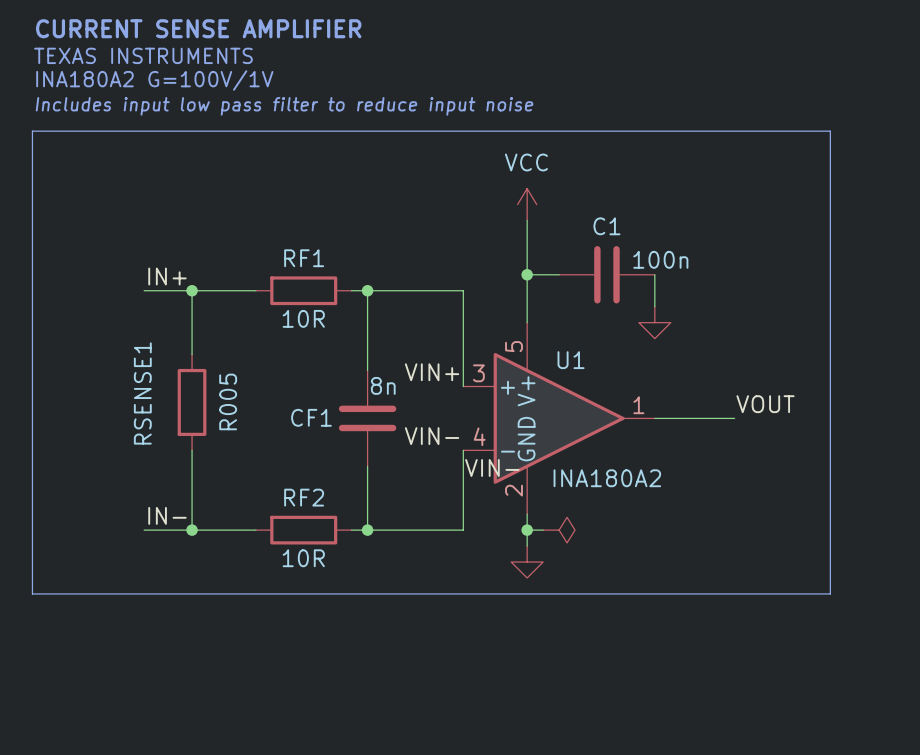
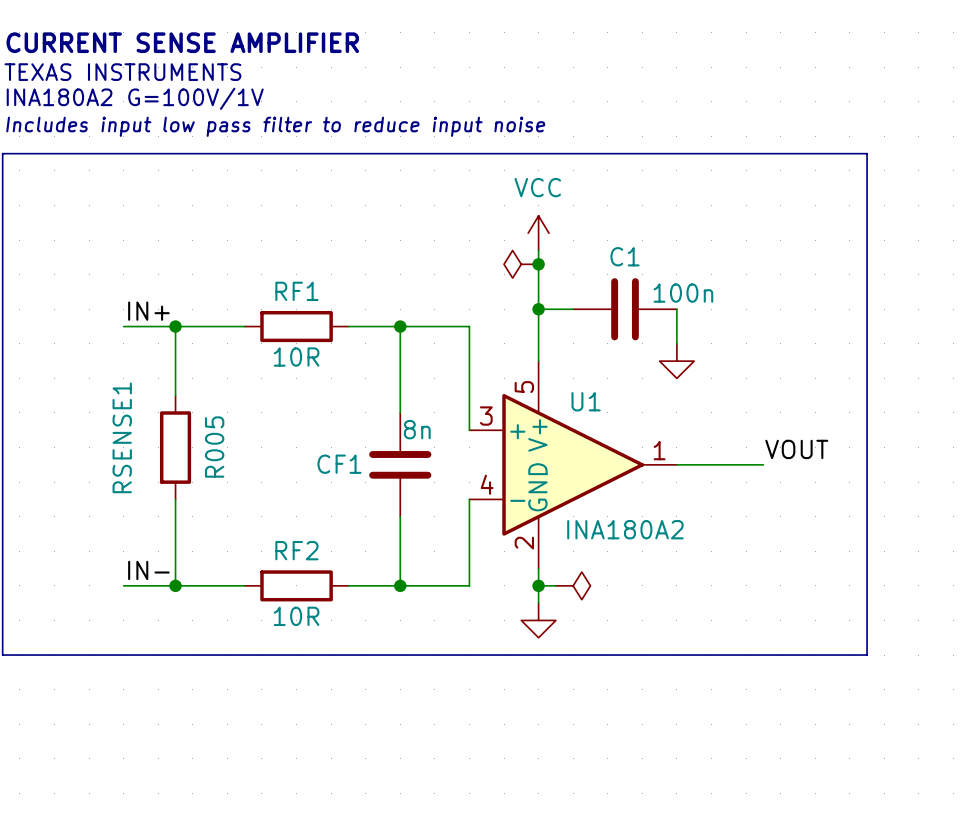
power symbol: none -> (521, 264)
junction: none -> (538, 264)
wire: (367, 290) (367, 370) -> (400, 326) (400, 412)
junction position: (367, 290) -> (400, 326)
label: VIN+ (432, 372) -> none
CF1 position: (367, 418) -> (400, 464)
label: VIN- (432, 436) -> none
wire: (367, 466) (367, 530) -> (400, 516) (400, 585)
label: VIN- (492, 468) -> none
junction position: (367, 530) -> (400, 585)

